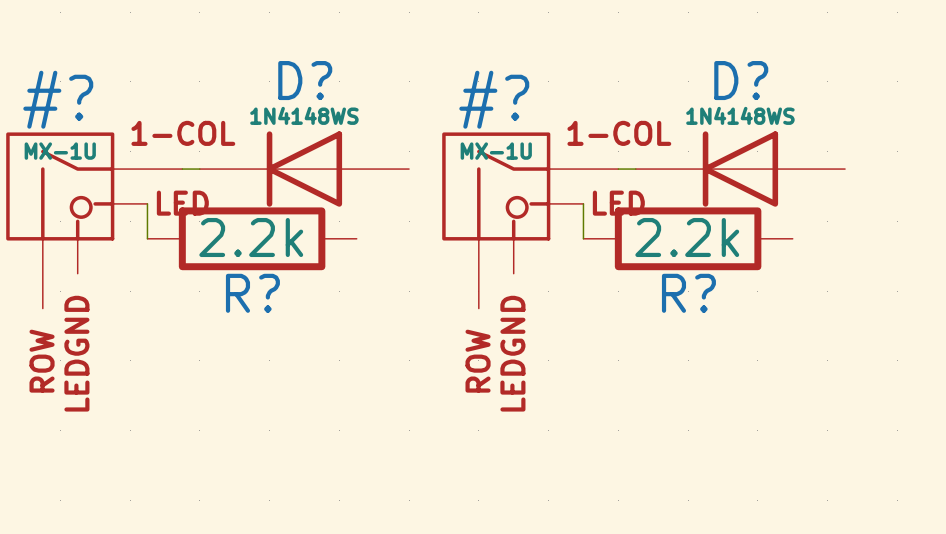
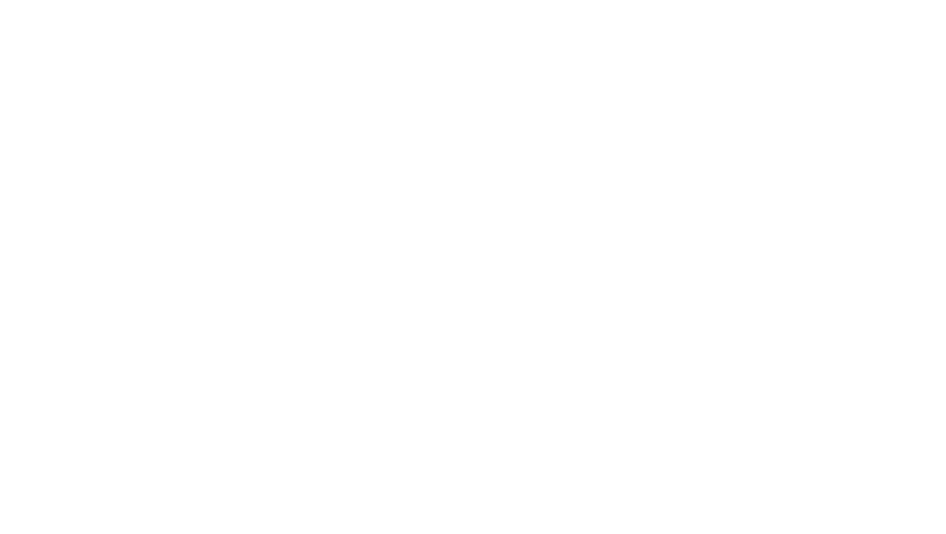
wire: (182, 169) (199, 169) -> none
D?: 1N4148WS (304, 169) -> none
wire: (618, 169) (635, 169) -> none
D?: 1N4148WS (740, 169) -> none
wire: (147, 203) (147, 238) -> none
wire: (583, 203) (583, 238) -> none
power symbol: MX-1U (94, 220) -> none
power symbol: MX-1U (530, 220) -> none
R?: 2.2k (252, 238) -> none
R?: 2.2k (688, 238) -> none

